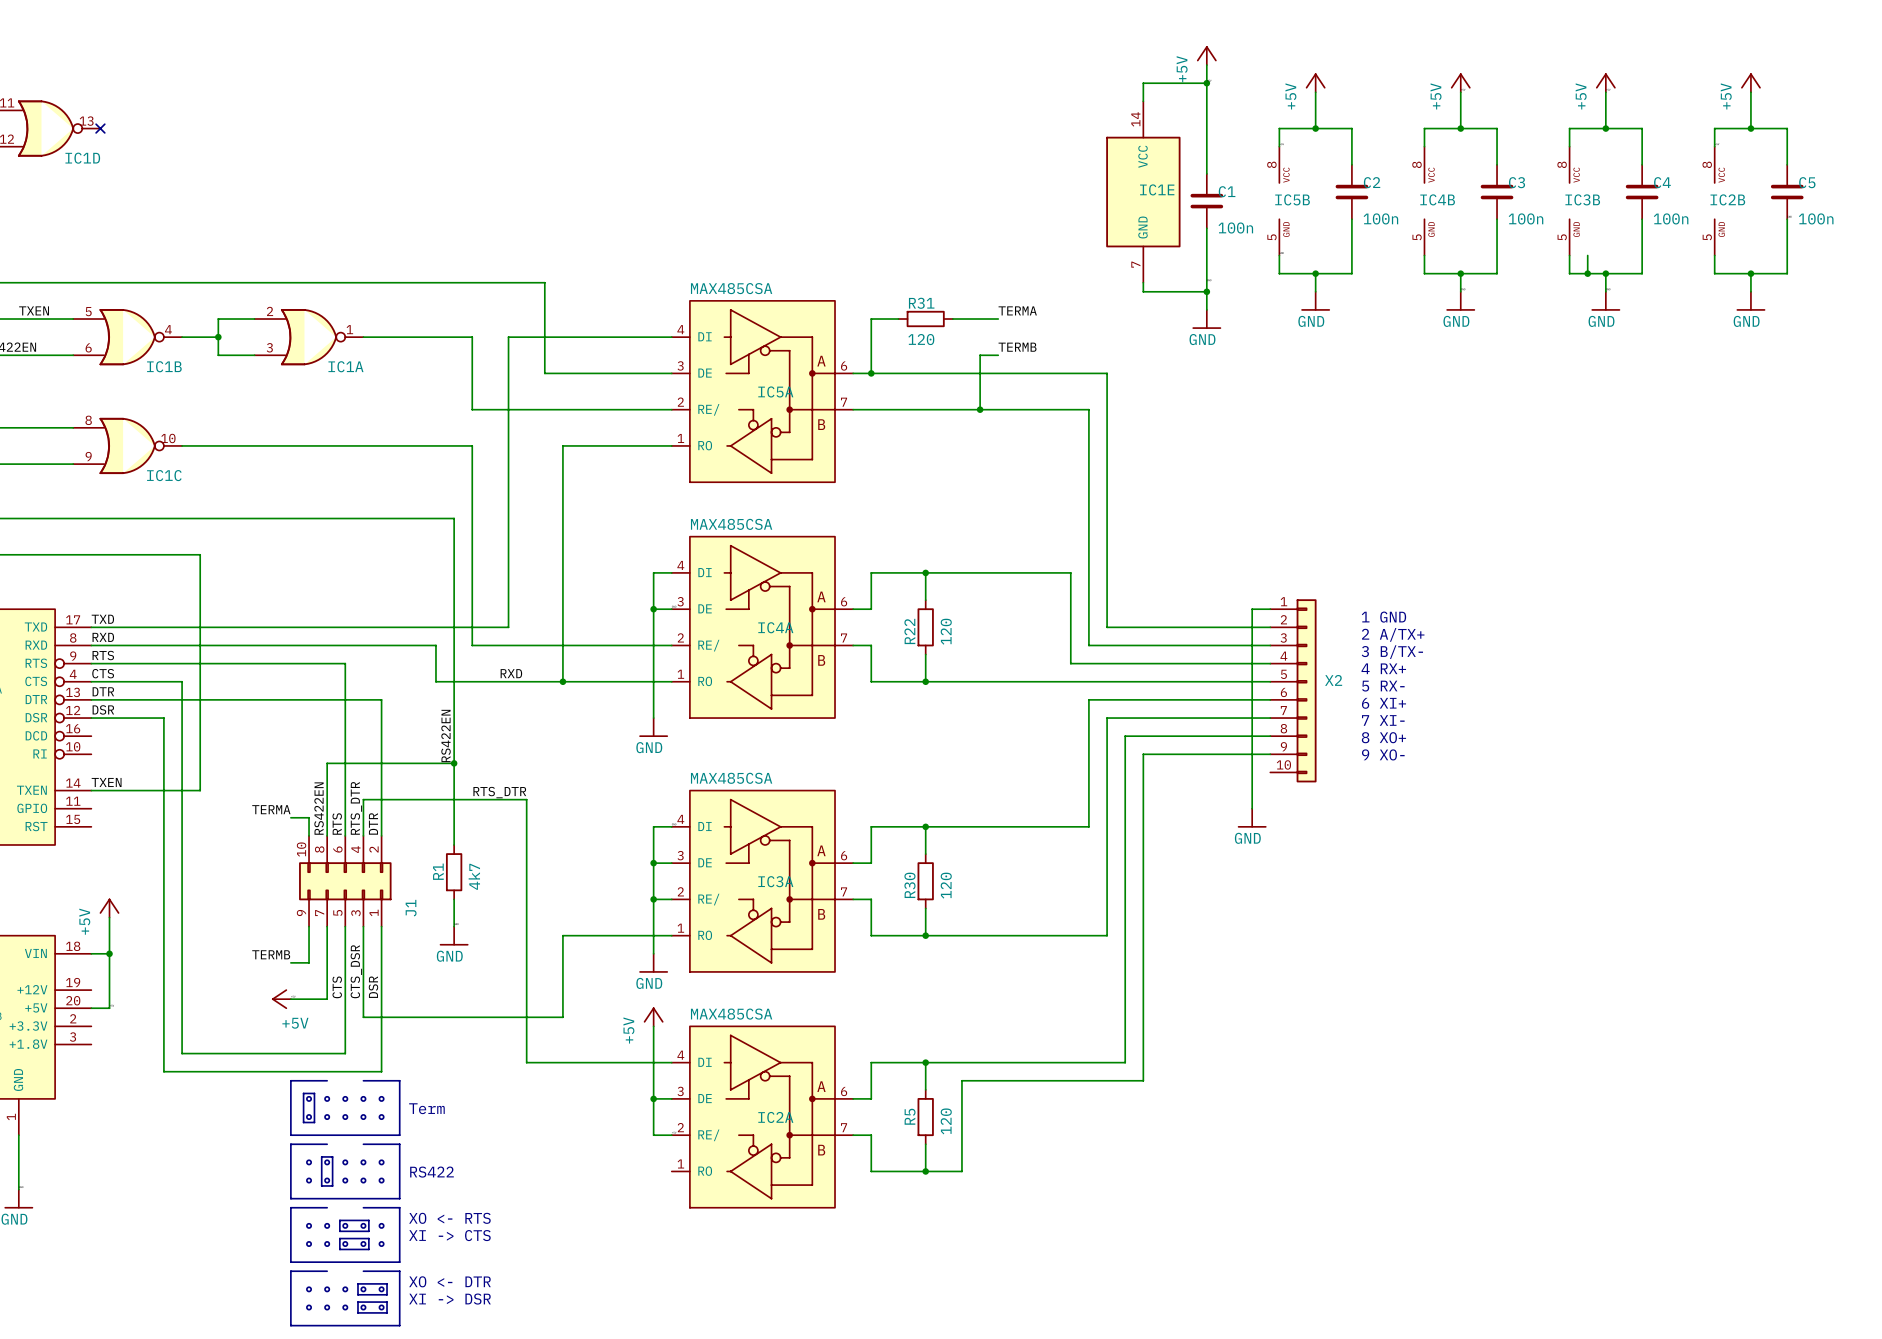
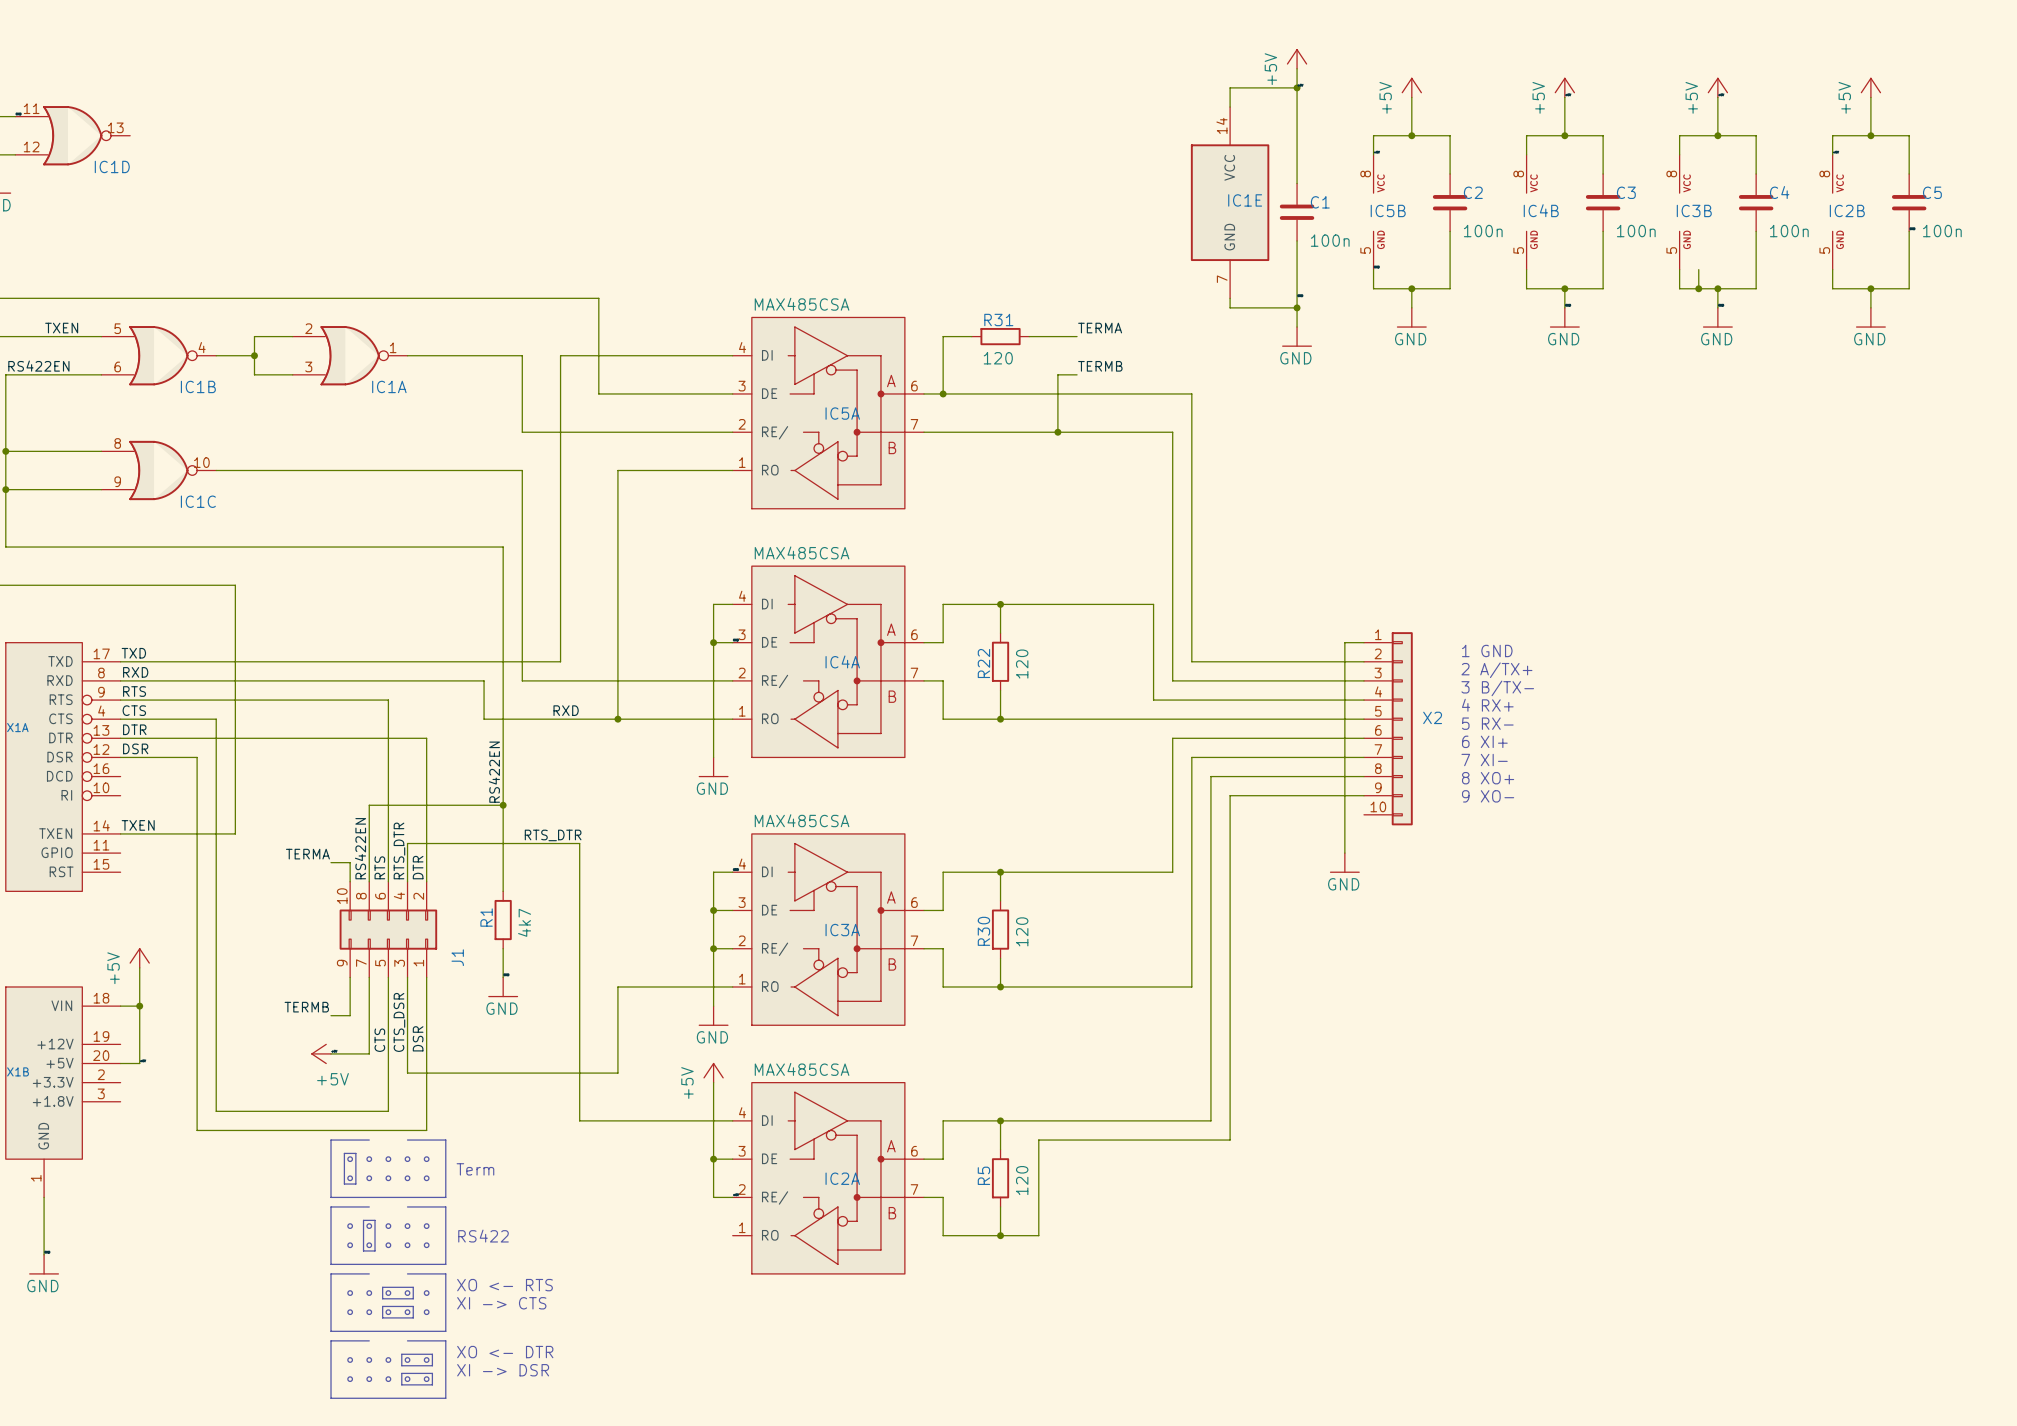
no-connect mark: (100, 128) -> none

